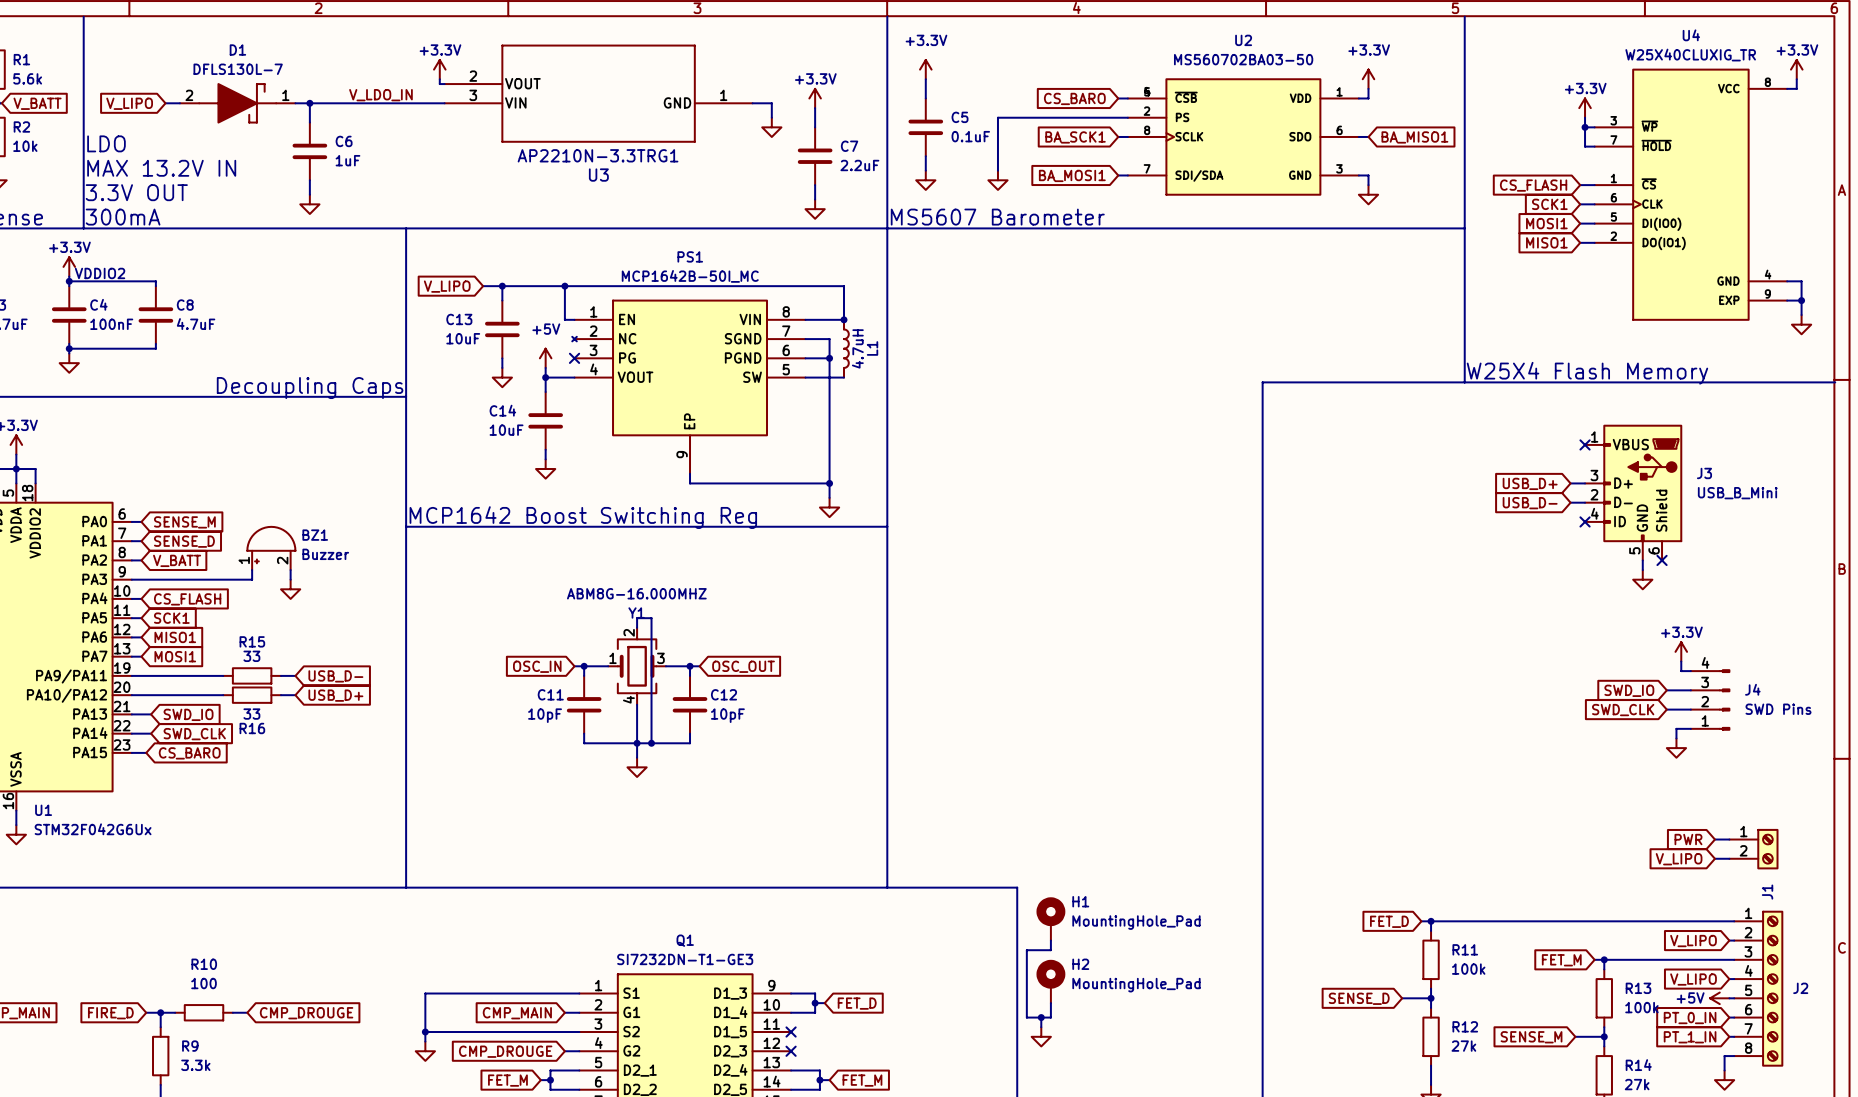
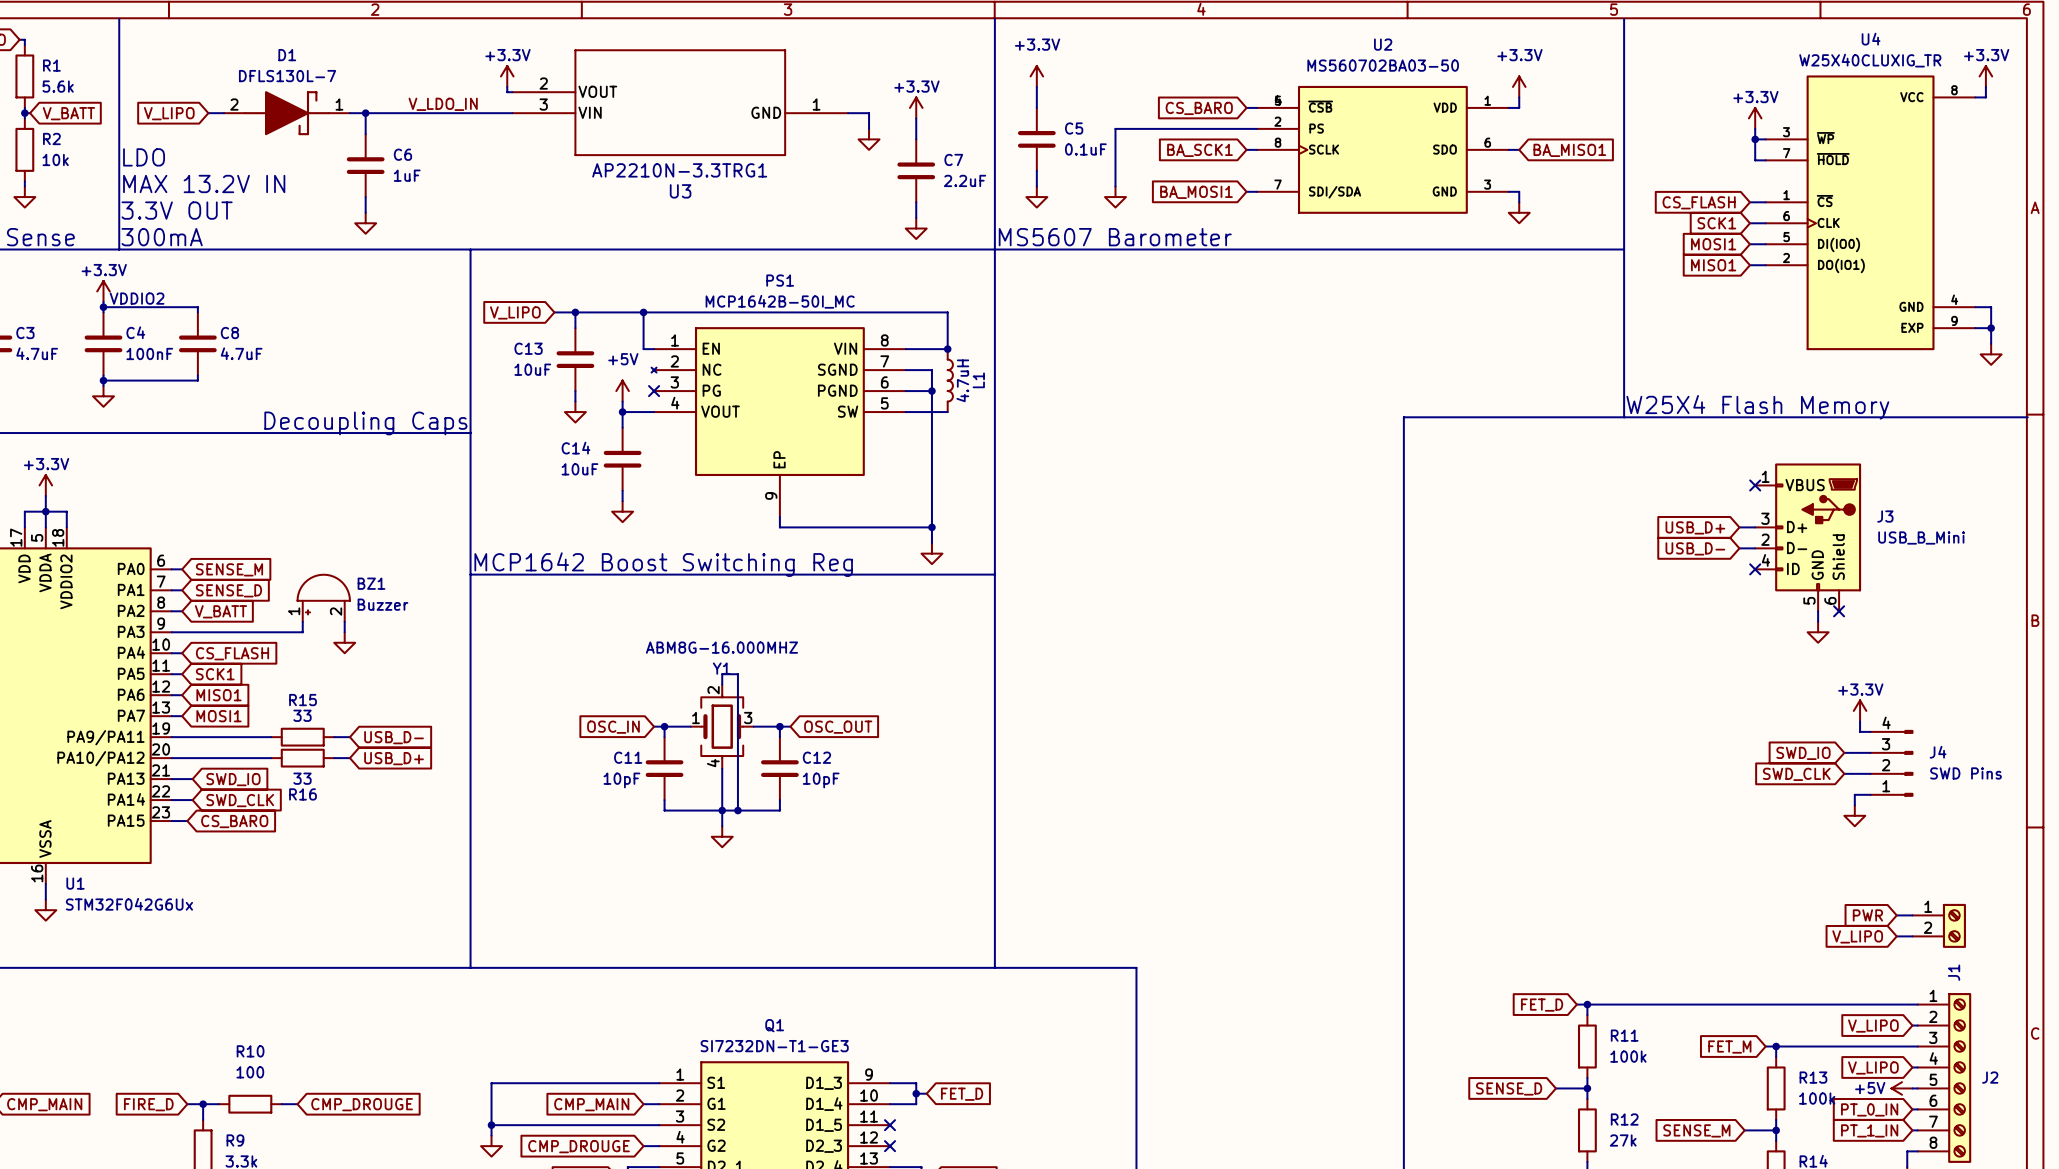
H1: MountingHole_Pad (1050, 918) -> none
wire: (1050, 940) (1050, 950) (1026, 950) (1026, 1017) (1050, 1017) (1050, 1003) -> none
H2: MountingHole_Pad (1050, 981) -> none
wire: (1041, 1017) (1041, 1027) -> none
junction: (1041, 1017) -> none
power symbol: (1041, 1036) -> none

